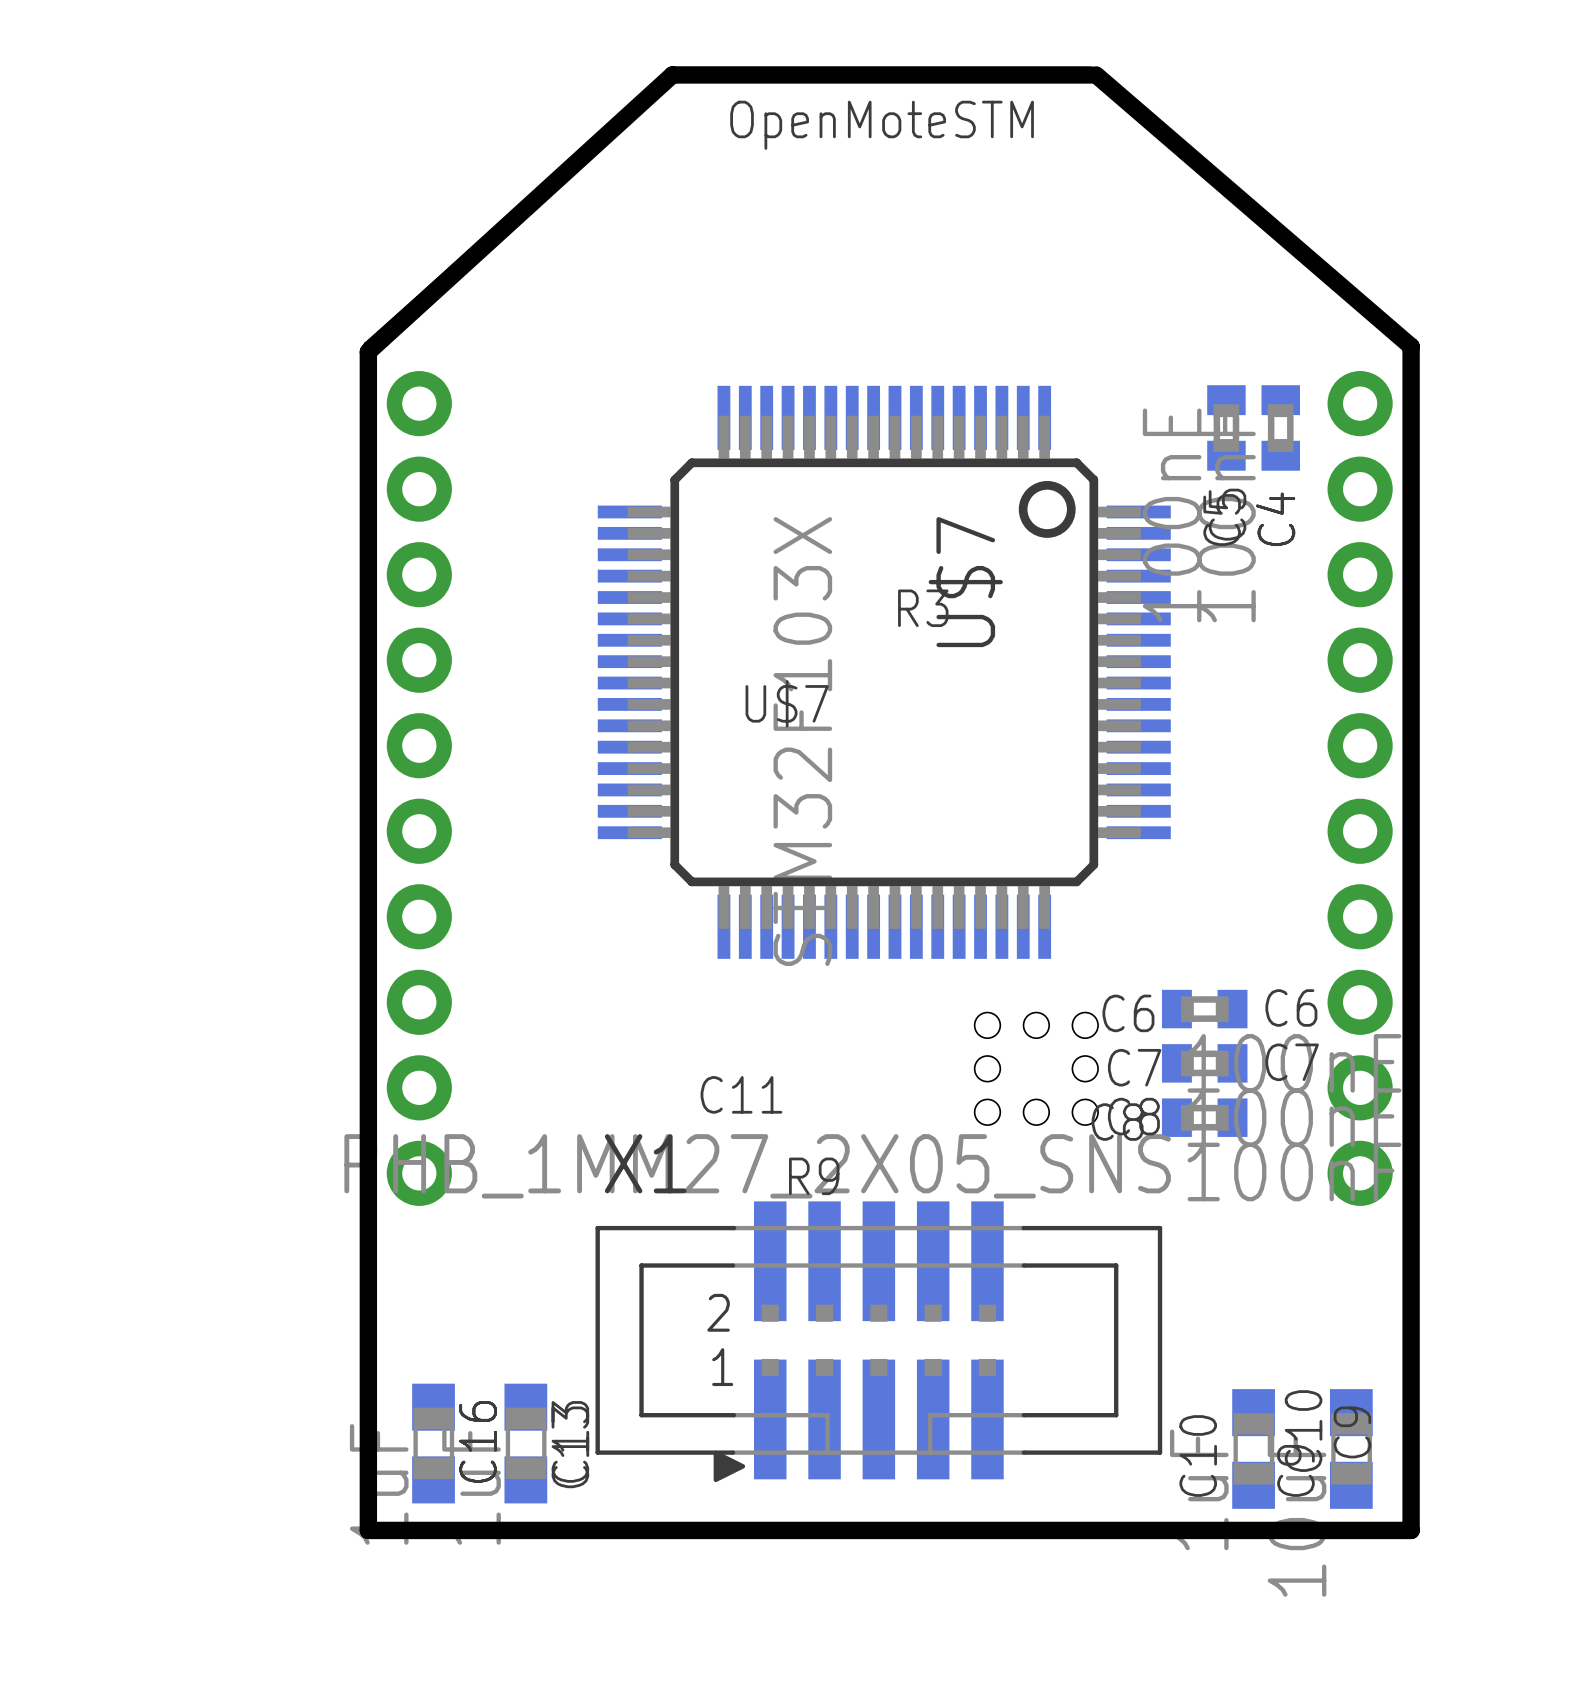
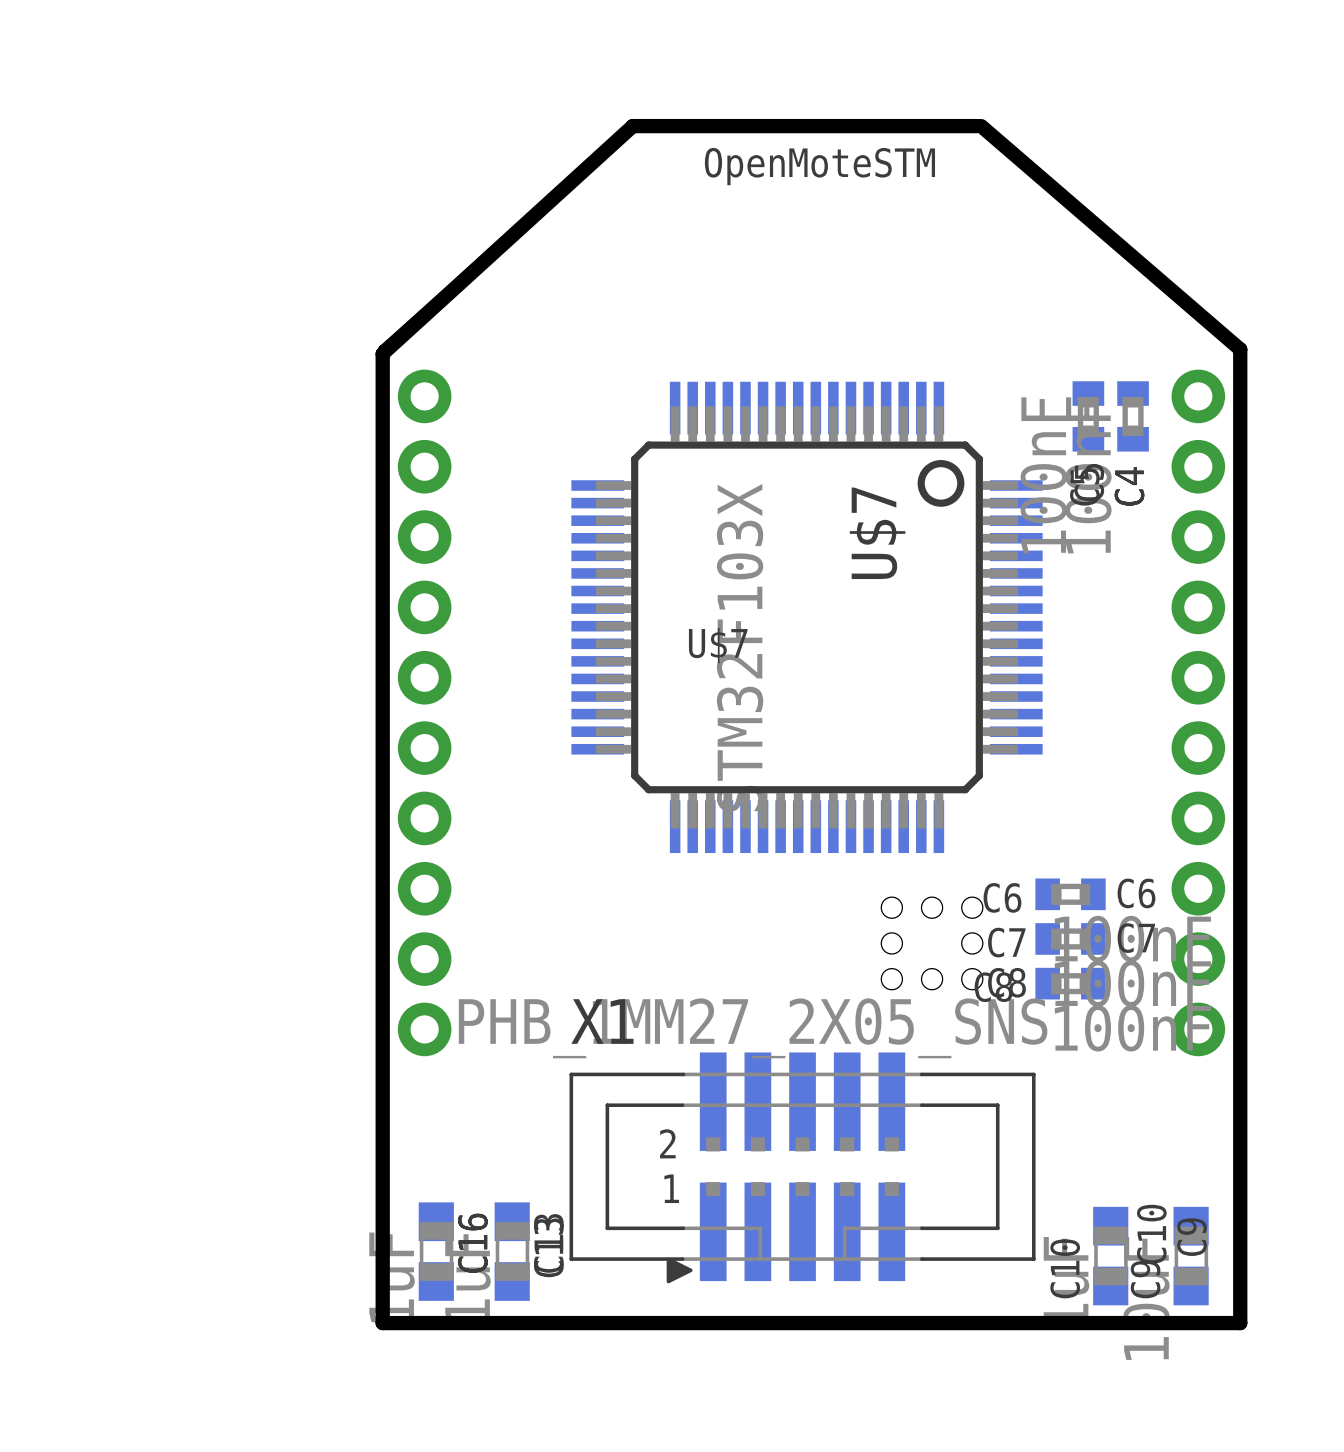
text: R3 (923, 608) -> none
text: C11 (741, 1094) -> none
text: R9 (814, 1176) -> none

